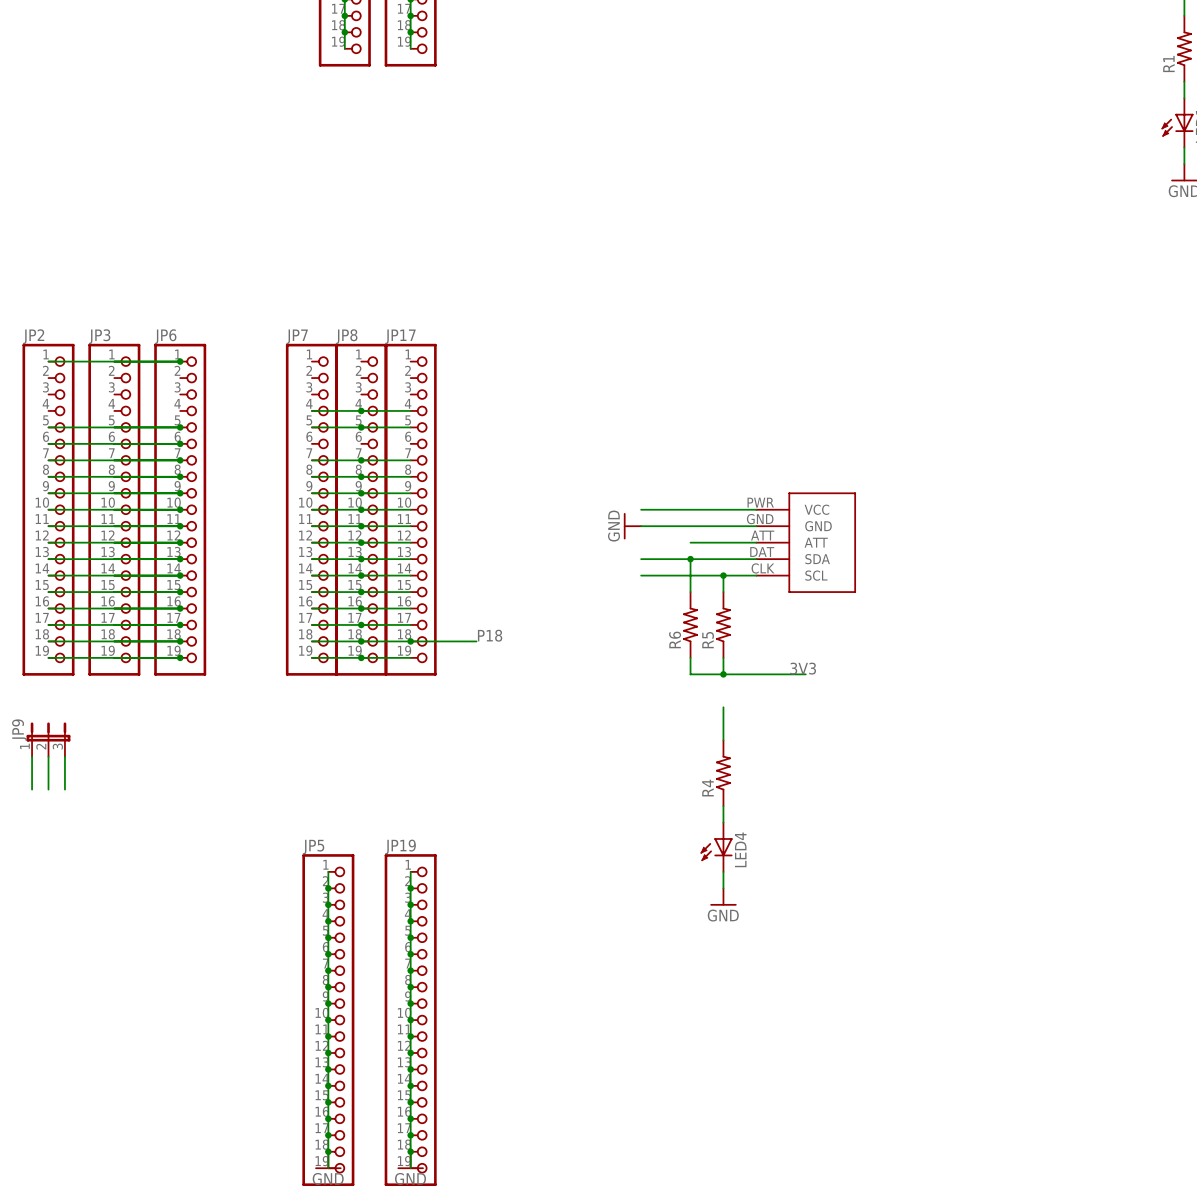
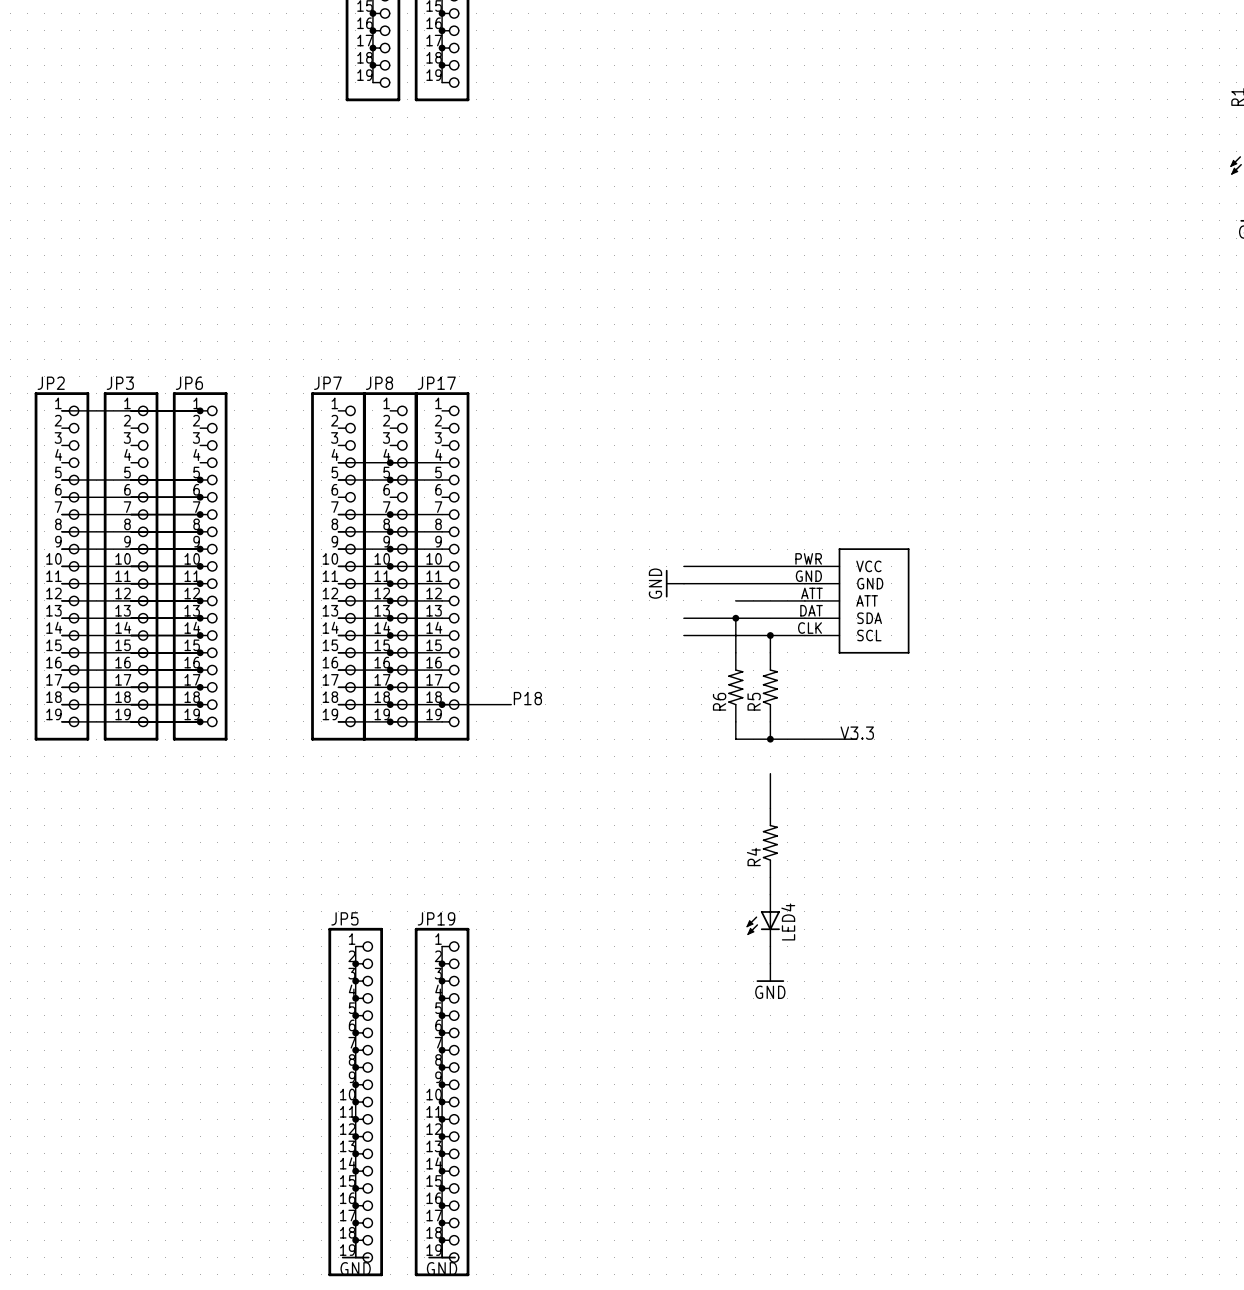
label: 3V3 (803, 668) -> V3.3 (857, 733)
JP9: (48, 739) -> none
wire: (32, 756) (32, 789) -> none
wire: (48, 756) (48, 789) -> none
wire: (64, 756) (64, 789) -> none

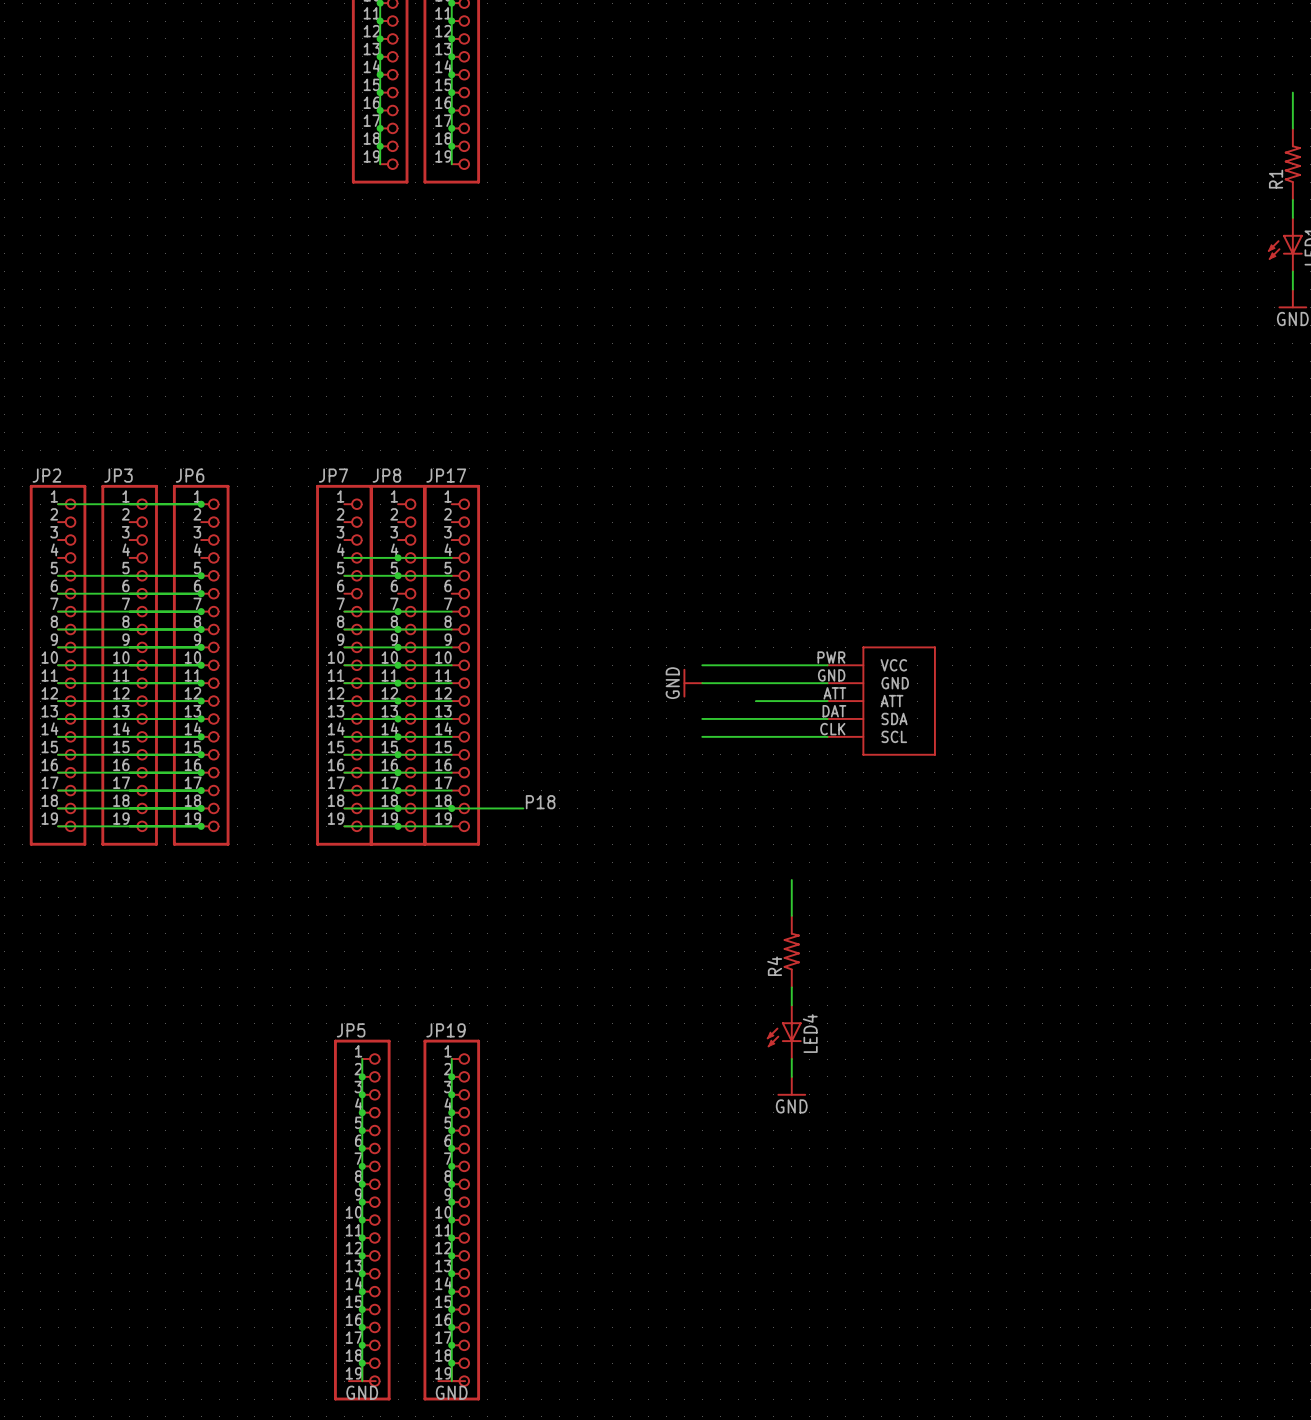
wire: (735, 618) (735, 652) -> none
junction: (735, 618) -> none
wire: (770, 635) (770, 652) -> none
junction: (770, 635) -> none
R6: (735, 687) -> none
R5: (770, 687) -> none
wire: (735, 721) (735, 739) (856, 739) -> none
wire: (770, 721) (770, 739) -> none
label: V3.3 (857, 733) -> none
junction: (770, 739) -> none

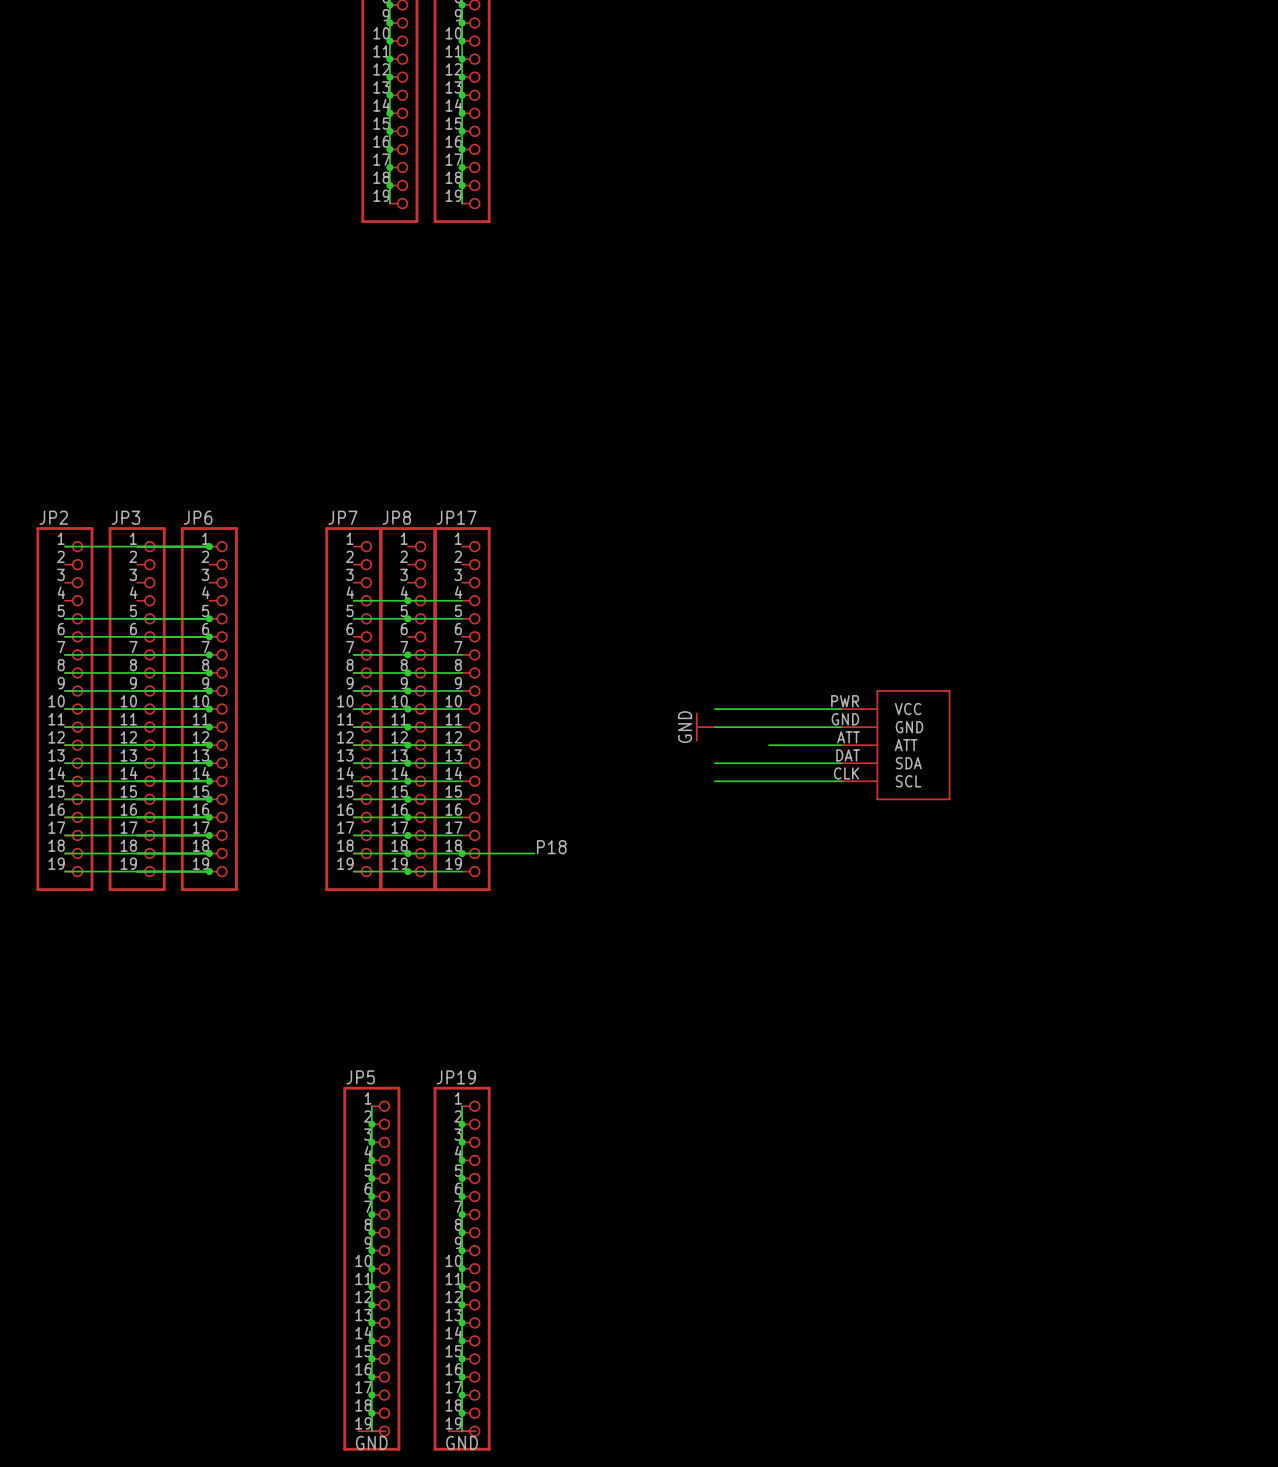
wire: (791, 880) (791, 915) -> none
R4: (791, 951) -> none
wire: (791, 987) (791, 1005) -> none
LED4: (784, 1032) -> none
wire: (791, 1059) (791, 1076) -> none
power symbol: GND (791, 1086) -> none

